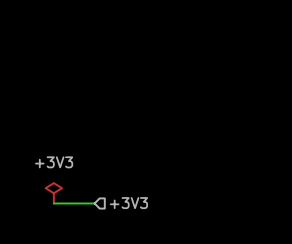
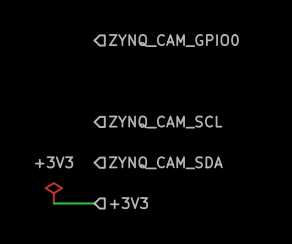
hierarchical label: none -> ZYNQ_CAM_GPIO0 (173, 40)
hierarchical label: none -> ZYNQ_CAM_SCL (165, 122)
hierarchical label: none -> ZYNQ_CAM_SDA (165, 162)

